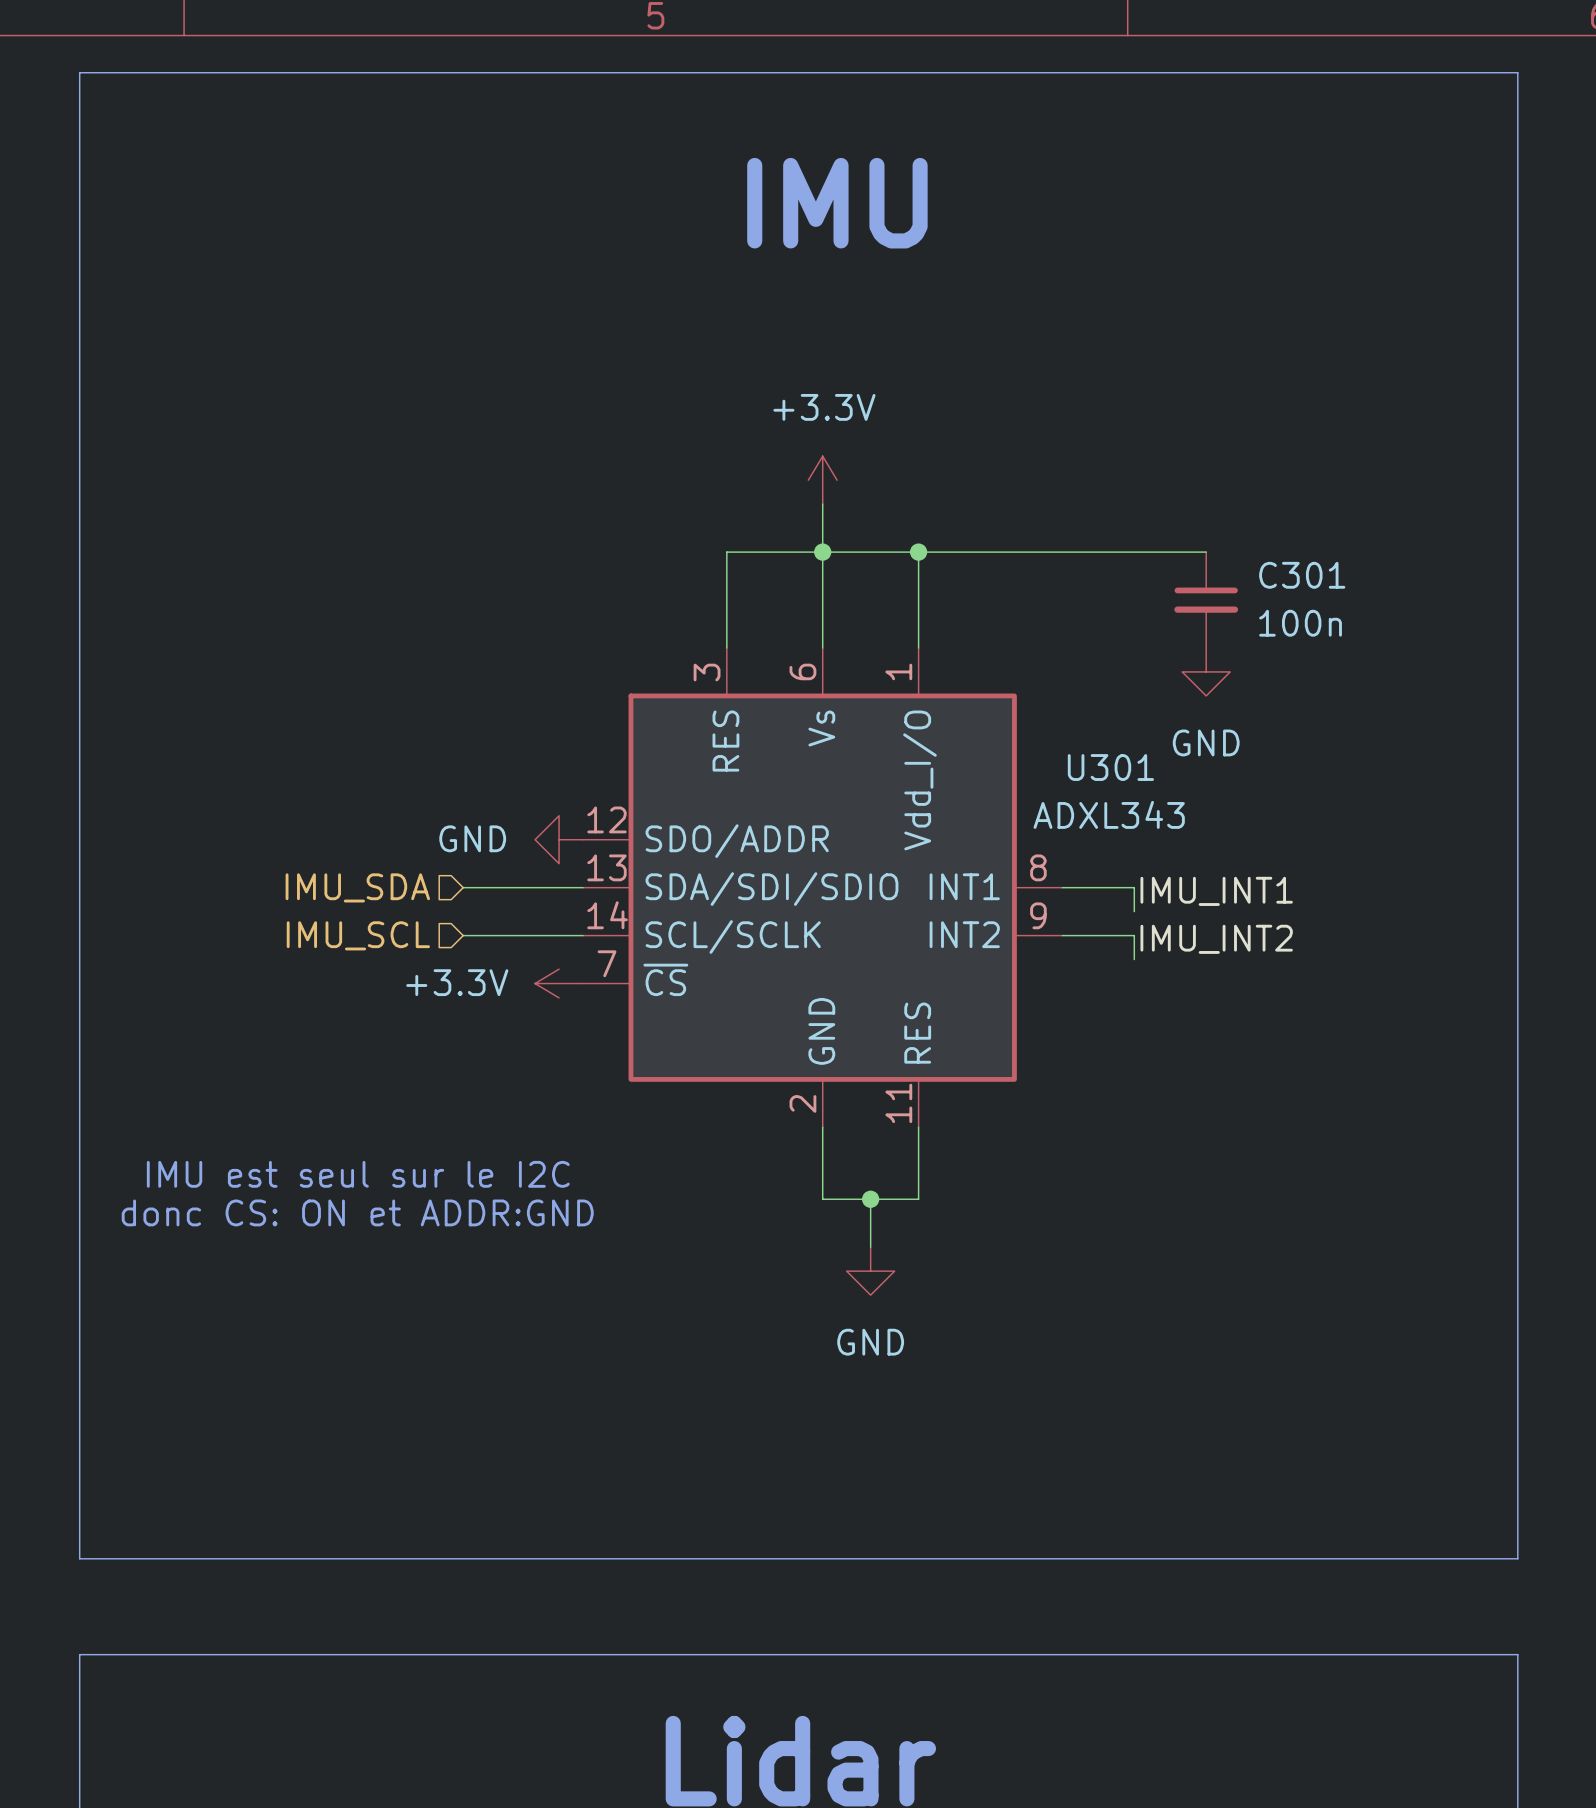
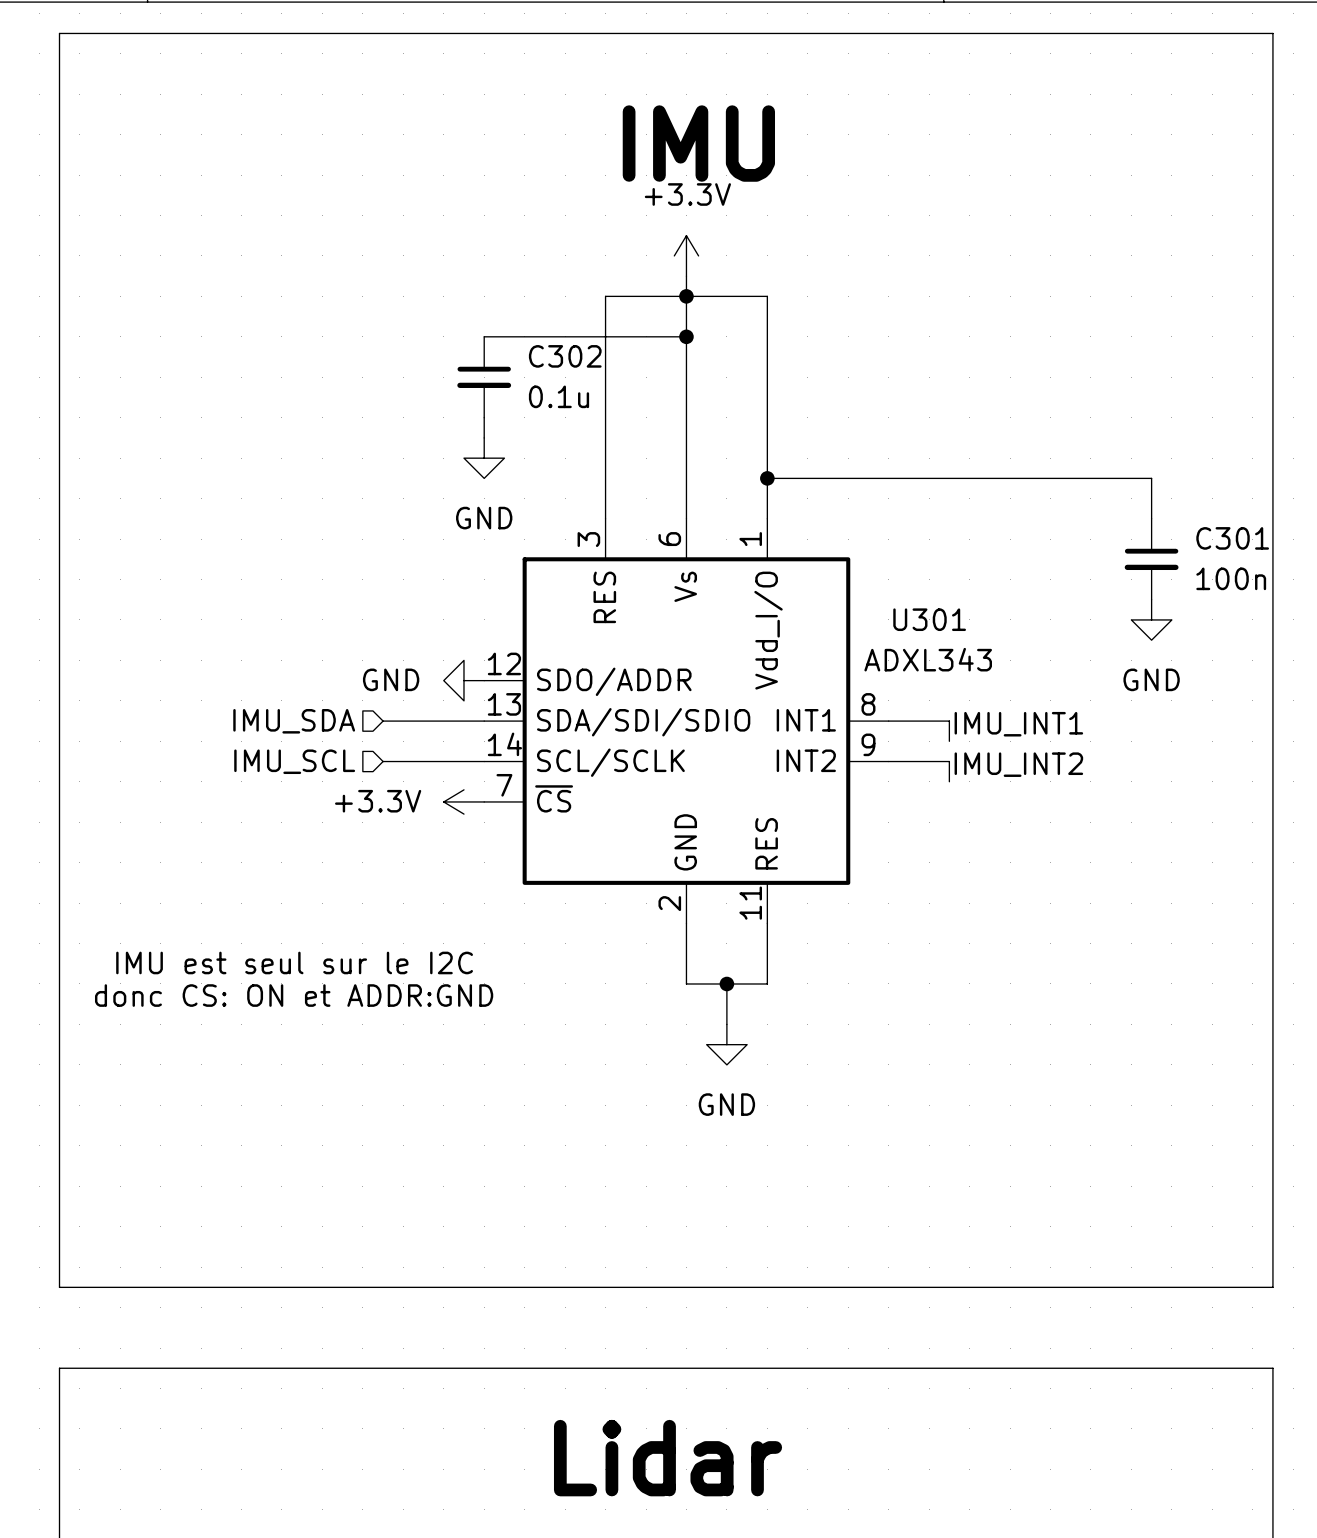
wire: none -> (686, 276) (686, 397)
junction: none -> (686, 296)
wire: none -> (484, 336) (686, 336)
junction: none -> (686, 336)
C302: none -> 0.1u (484, 377)
power symbol position: +3.3V (822, 480) -> +3.3V (686, 255)
wire: none -> (484, 417) (484, 437)
wire: (726, 552) (1206, 552) -> (605, 437) (605, 296) (767, 296) (767, 437)
junction: (822, 552) -> none
junction position: (918, 552) -> (767, 478)
power symbol: none -> GND (484, 458)
wire: none -> (767, 478) (1151, 478) (1151, 518)
C301 position: (1206, 600) -> (1151, 559)
power symbol position: GND (1206, 671) -> GND (1151, 619)

